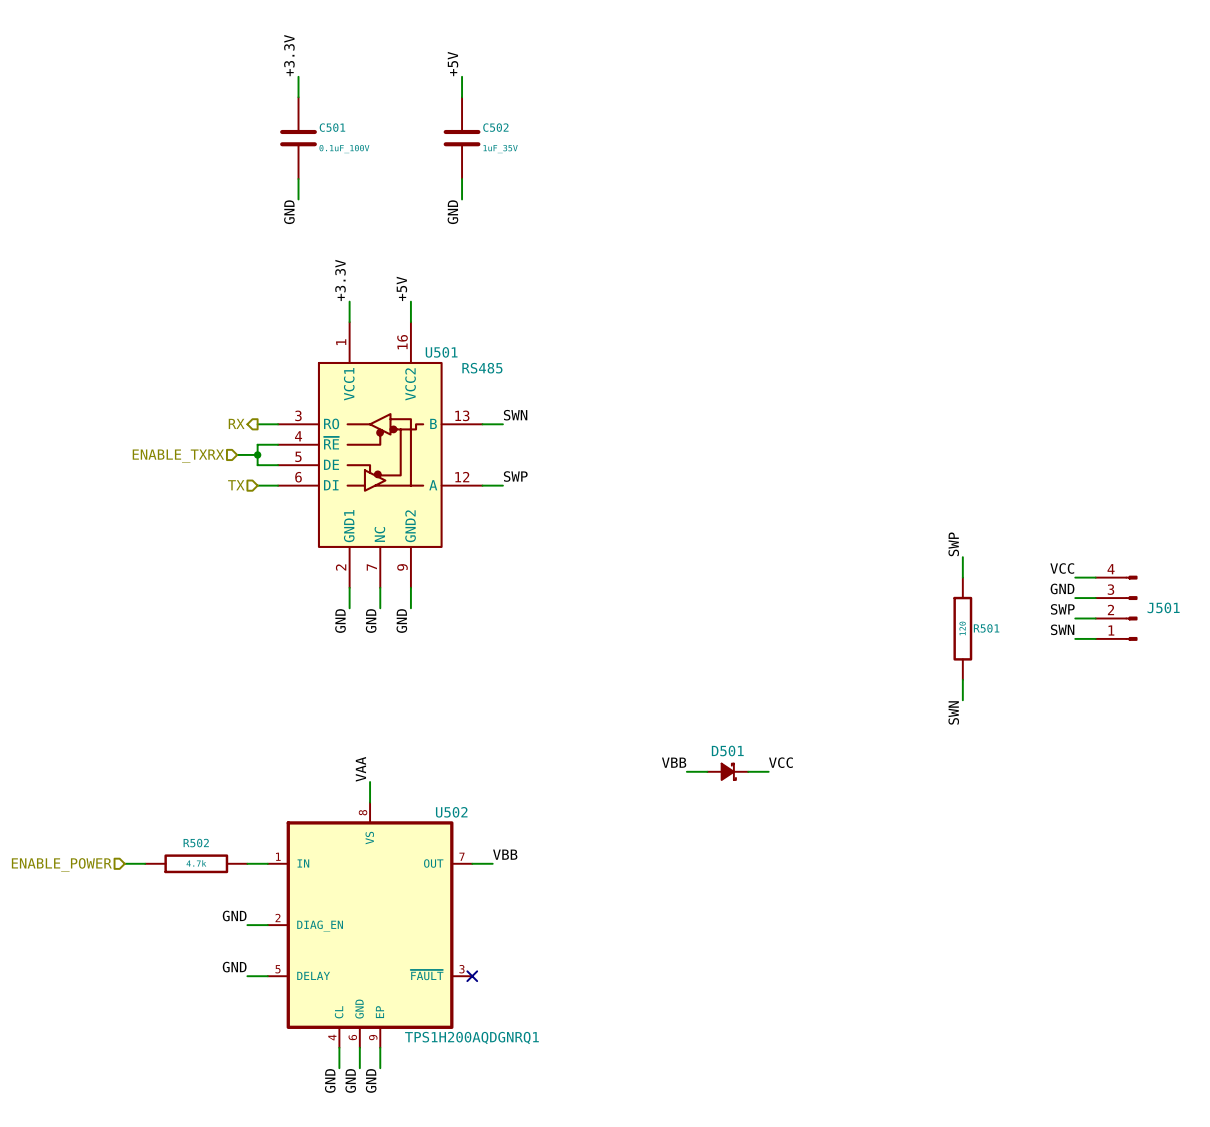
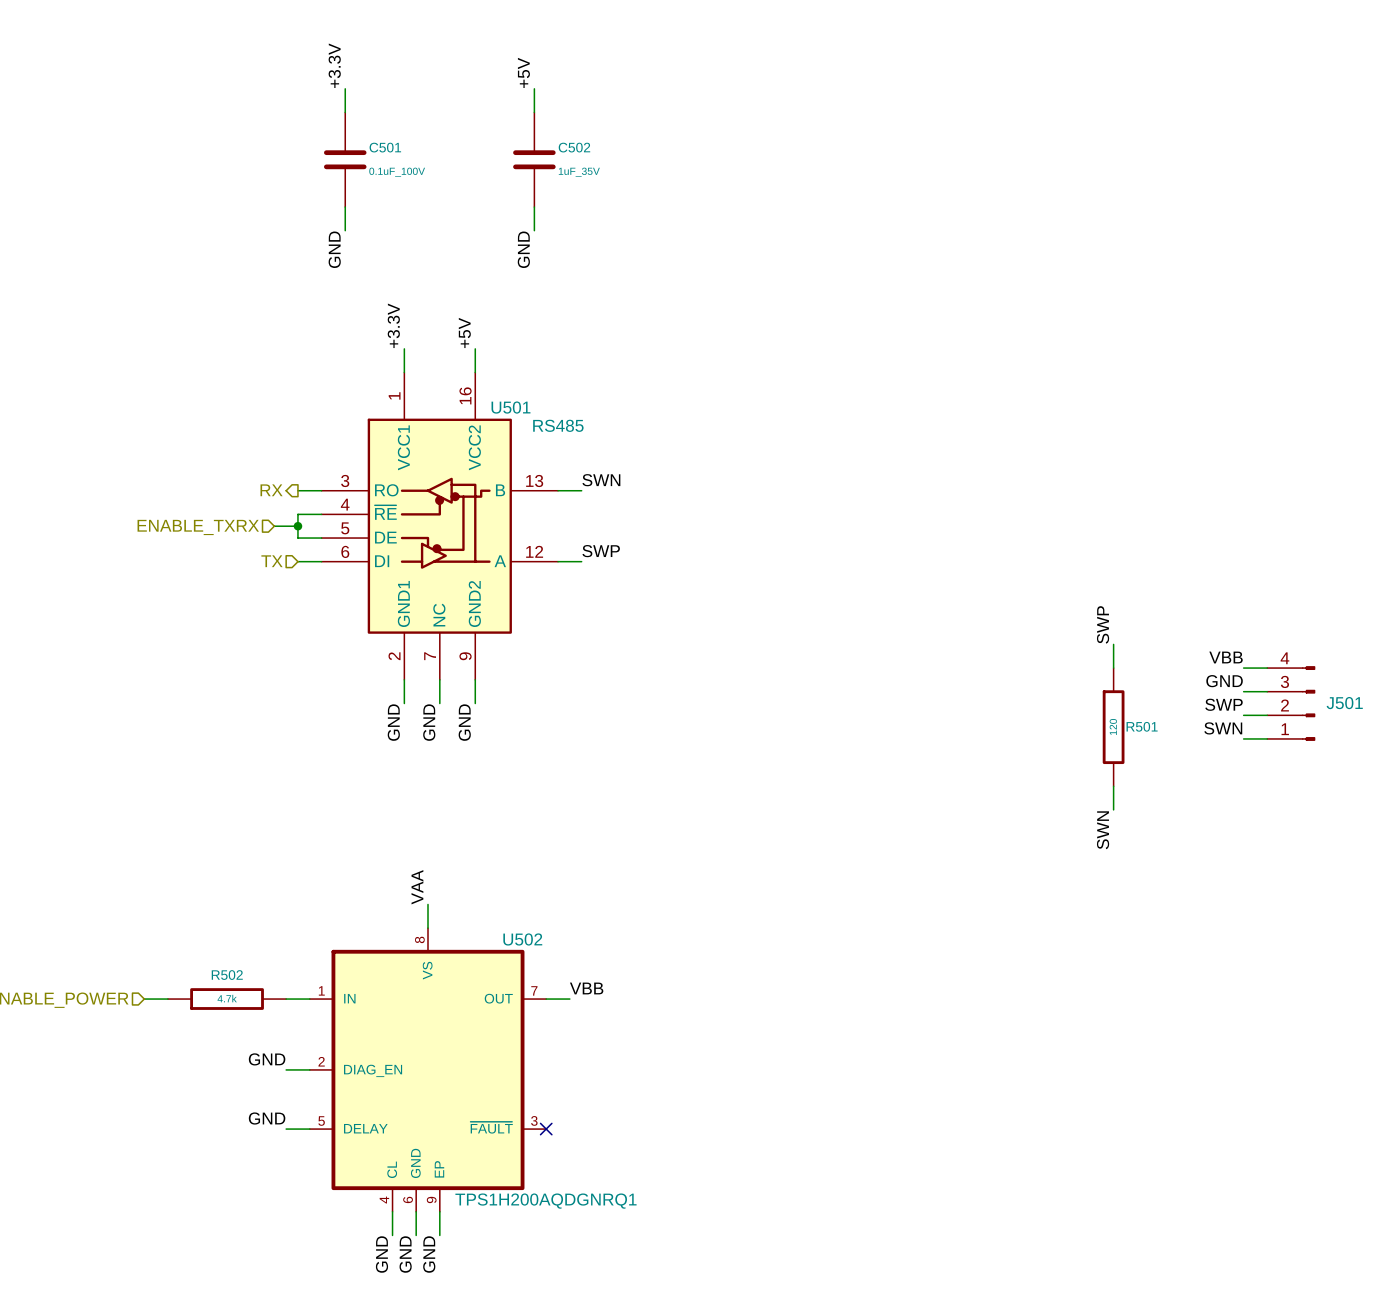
label: VCC (1062, 568) -> VBB (1226, 657)
label: VBB (674, 762) -> none
label: VCC (780, 762) -> none
wire: (686, 771) (707, 771) -> none
D501: (727, 771) -> none
wire: (748, 771) (768, 771) -> none

